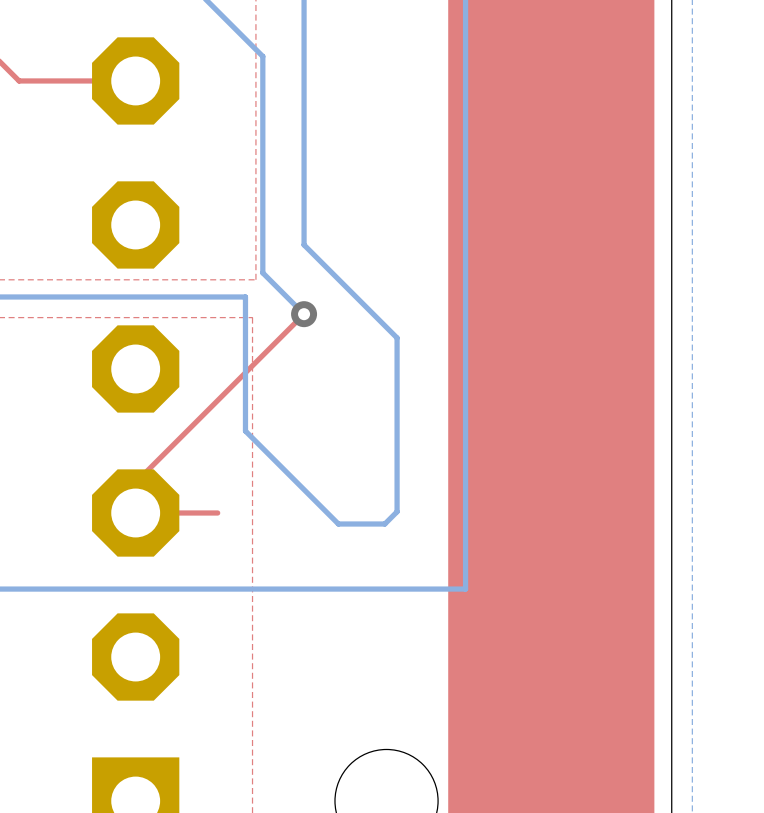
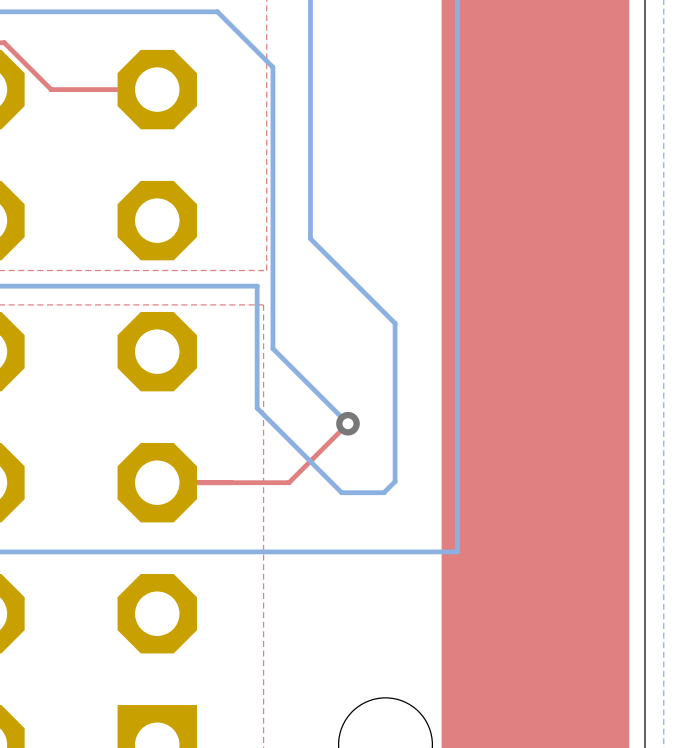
bottom track: (262, 272) (304, 314) -> (272, 264) (272, 348) (347, 423)
top track: (304, 314) (135, 482) (135, 513) -> none
via position: (304, 314) -> (347, 423)
top track: none -> (347, 423) (289, 482) (231, 482)

